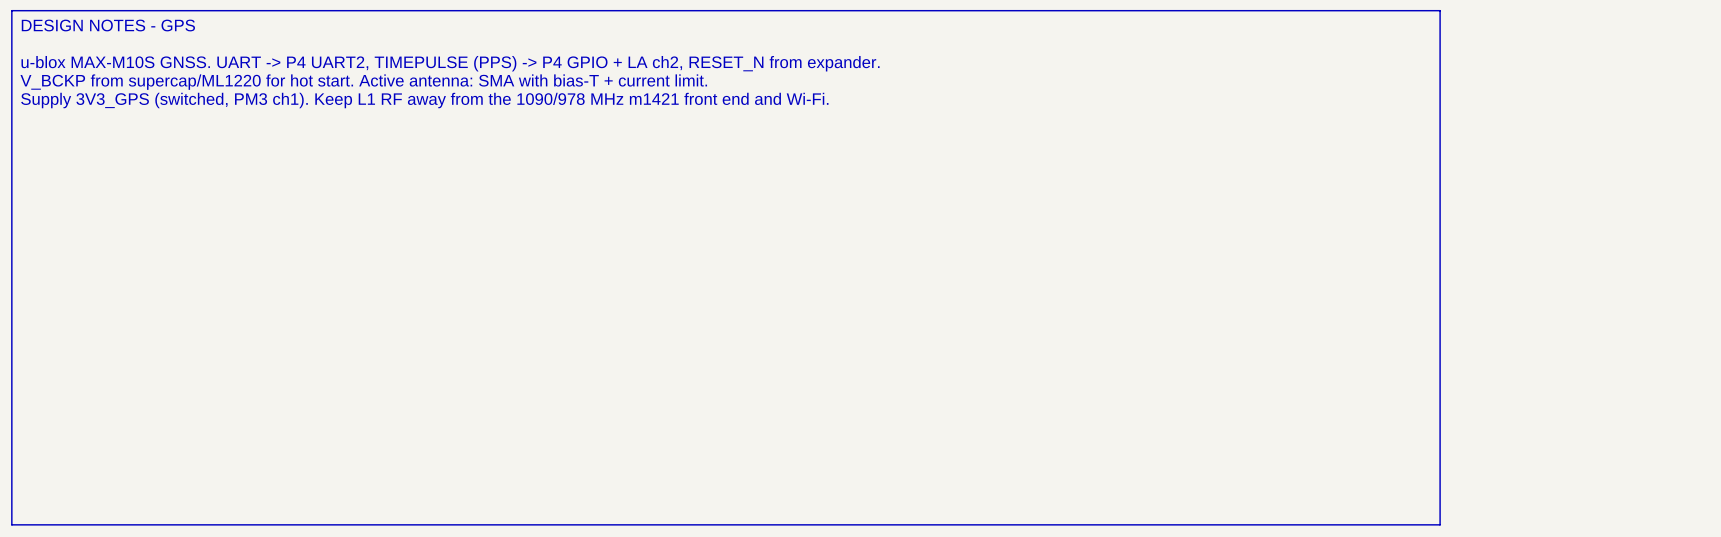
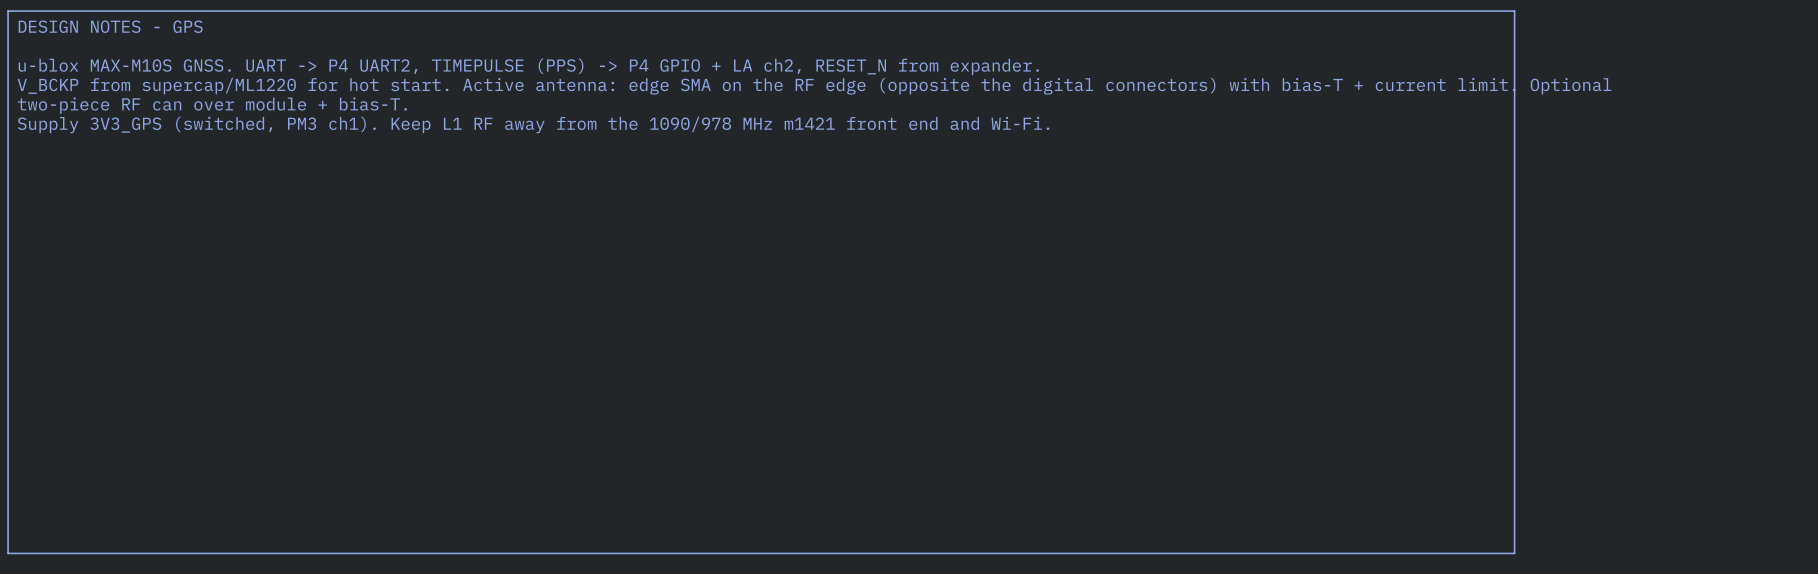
text: V_BCKP from supercap/ML1220 for hot start. Active antenna: SMA with bias-T + current limit. (363, 82) -> V_BCKP from supercap/ML1220 for hot start. Active antenna: edge SMA on the RF edge (opposite the digital connectors) with bias-T + current limit. Optional (814, 86)
text: Supply 3V3_GPS (switched, PM3 ch1). Keep L1 RF away from the 1090/978 MHz m1421 front end and Wi-Fi. (424, 100) -> two-piece RF can over module + bias-T. (212, 105)
text: none -> Supply 3V3_GPS (switched, PM3 ch1). Keep L1 RF away from the 1090/978 MHz m1421 front end and Wi-Fi. (533, 124)

